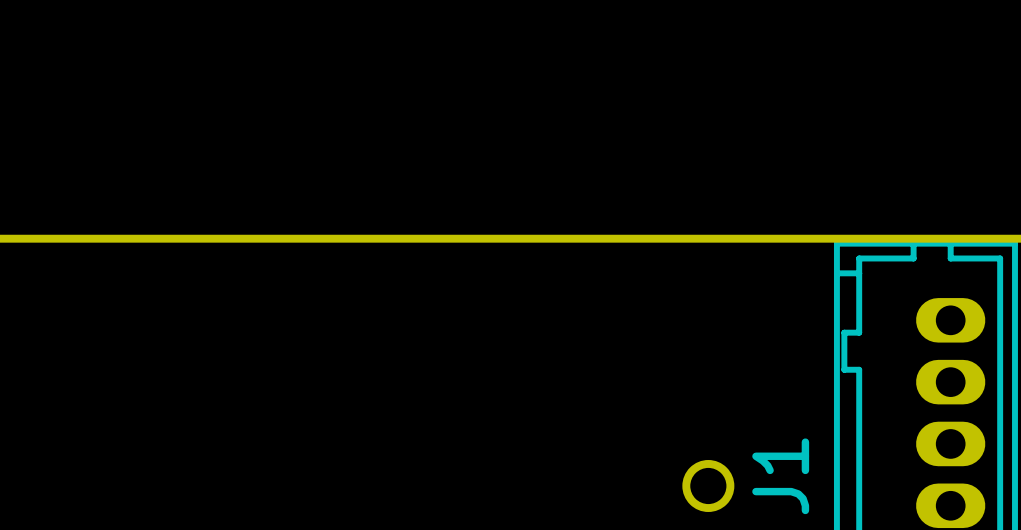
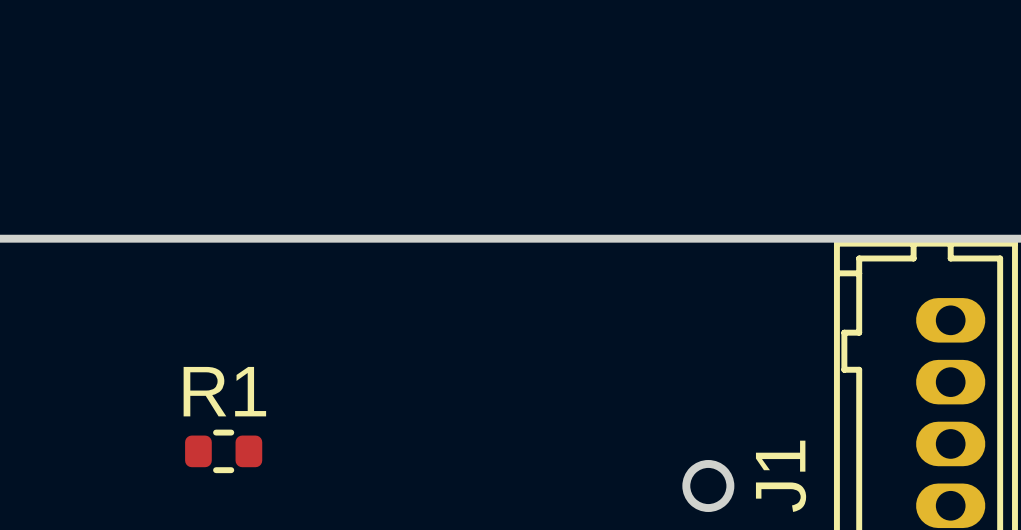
R1: none -> (223, 451)

